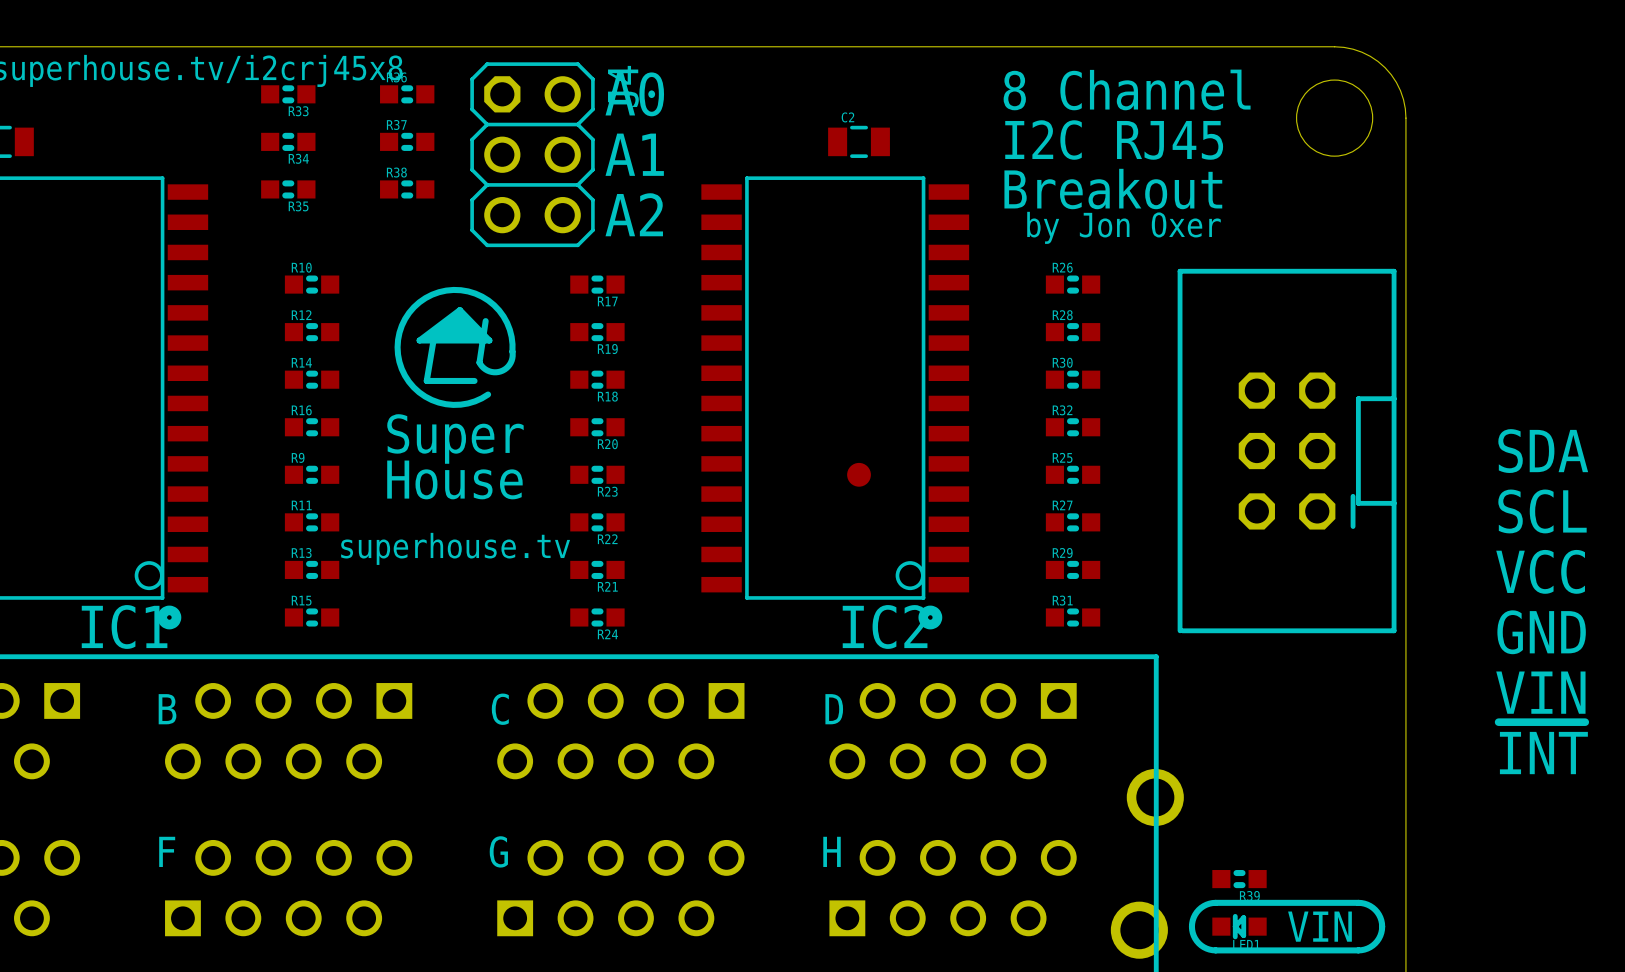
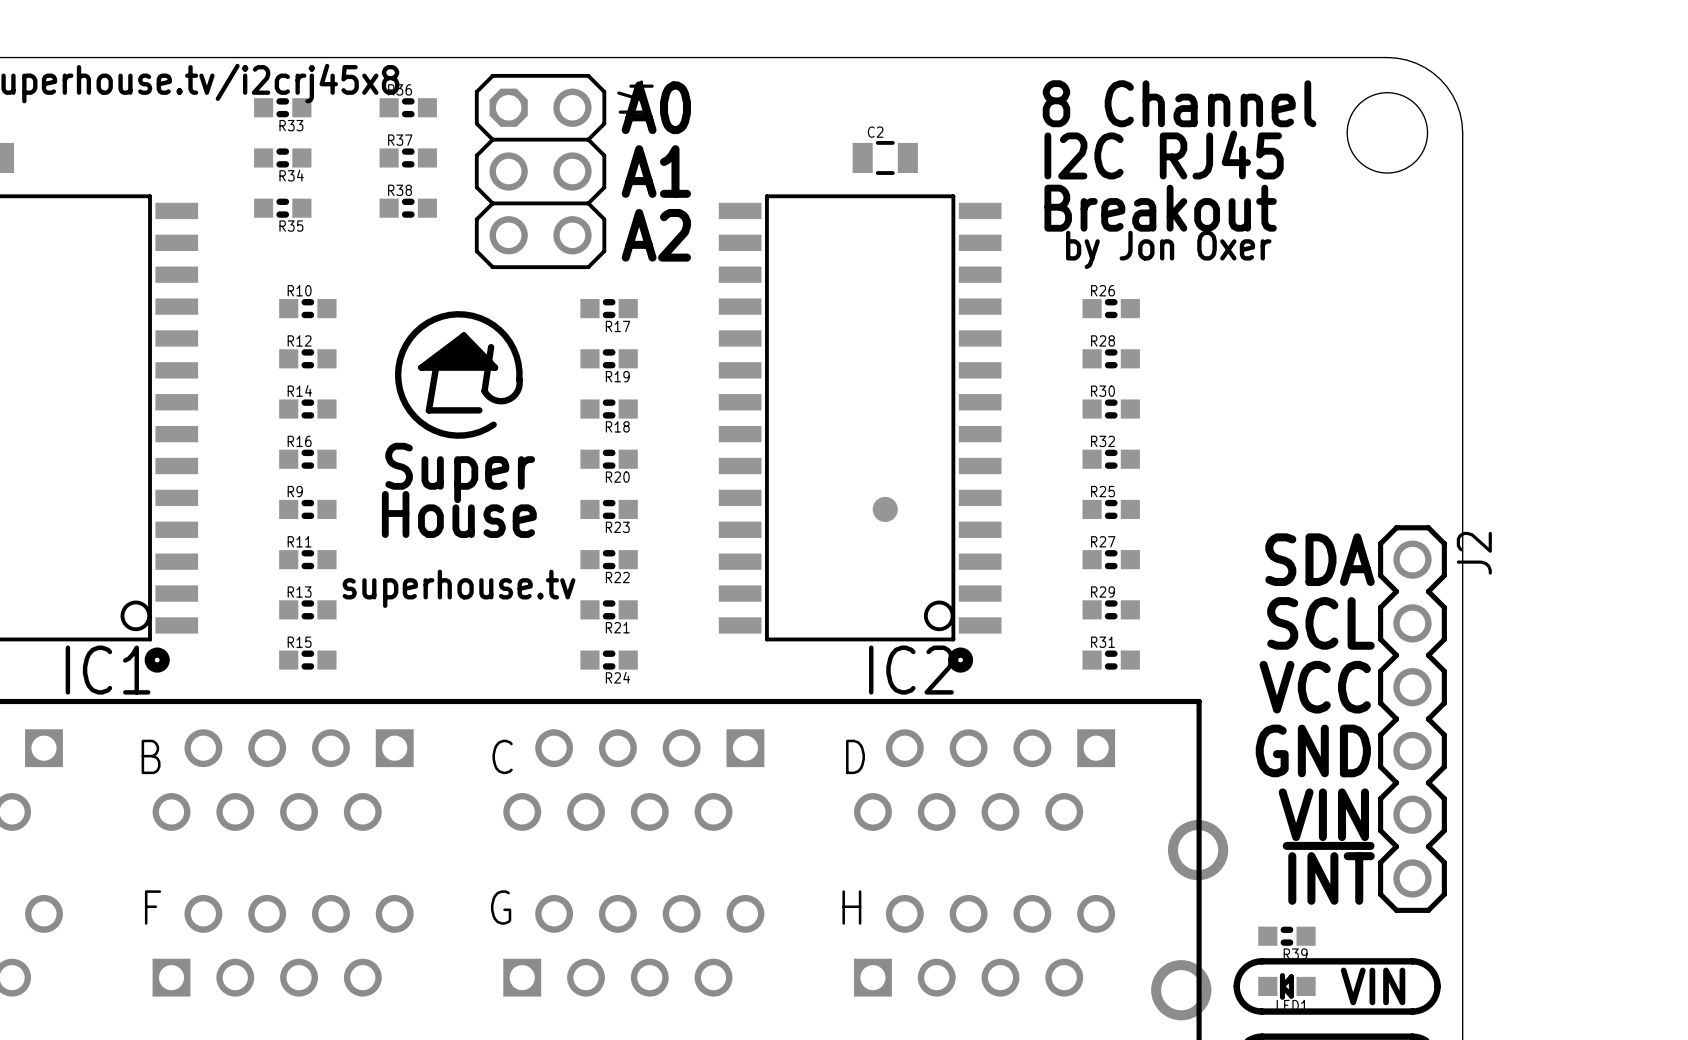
part: (1287, 451) -> none
text position: SDA (1543, 451) -> SDA (1320, 559)
text position: SCL (1542, 511) -> SCL (1320, 623)
text position: VCC (1540, 571) -> VCC (1315, 687)
text position: GND (1541, 632) -> GND (1313, 750)
J2: none -> (1412, 719)
text position: VIN (1540, 692) -> VIN (1323, 814)
text position: ~{INT} (1543, 748) -> ~{INT} (1328, 873)

